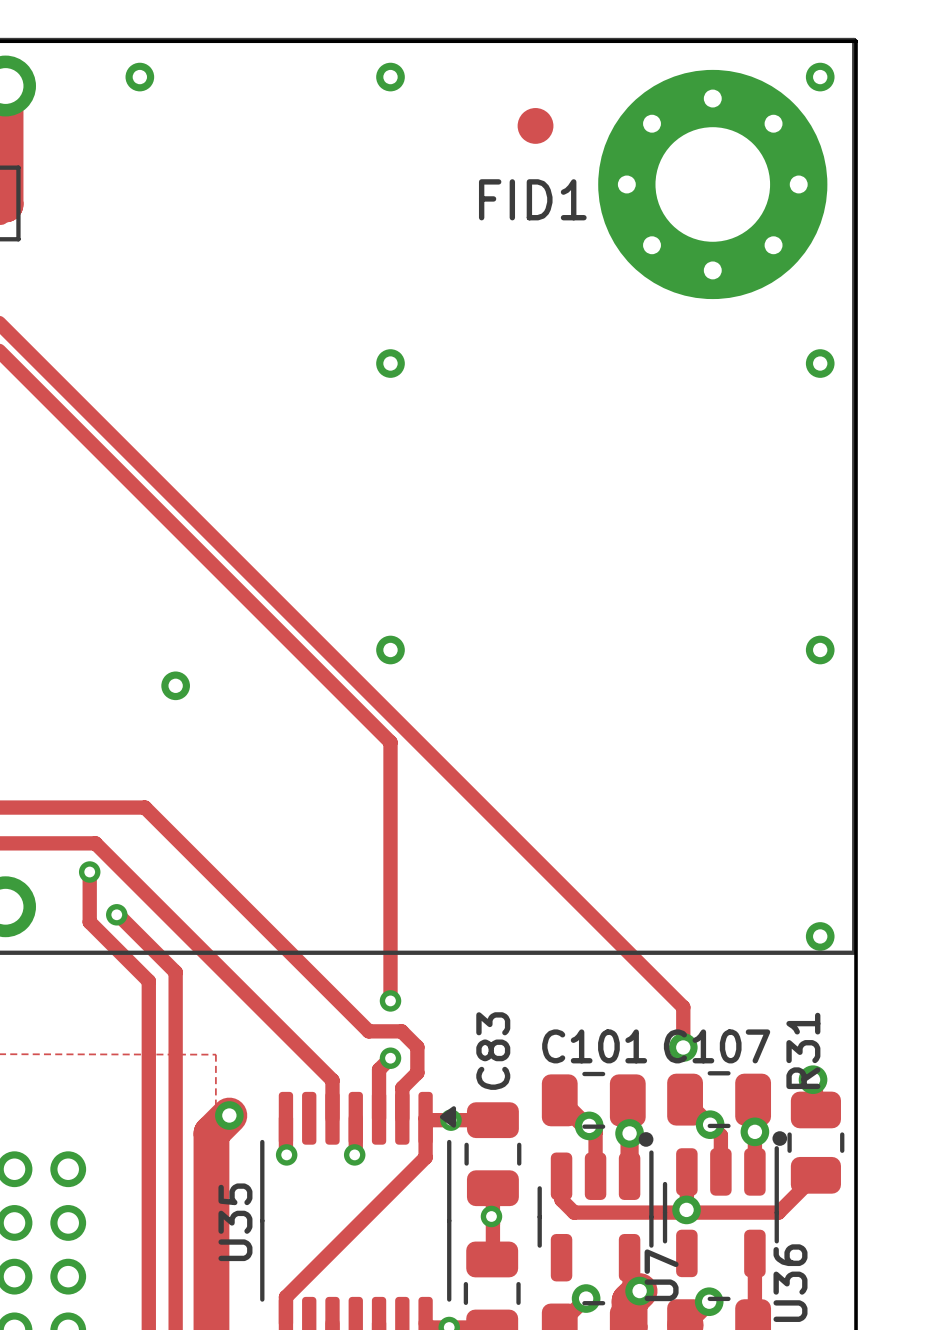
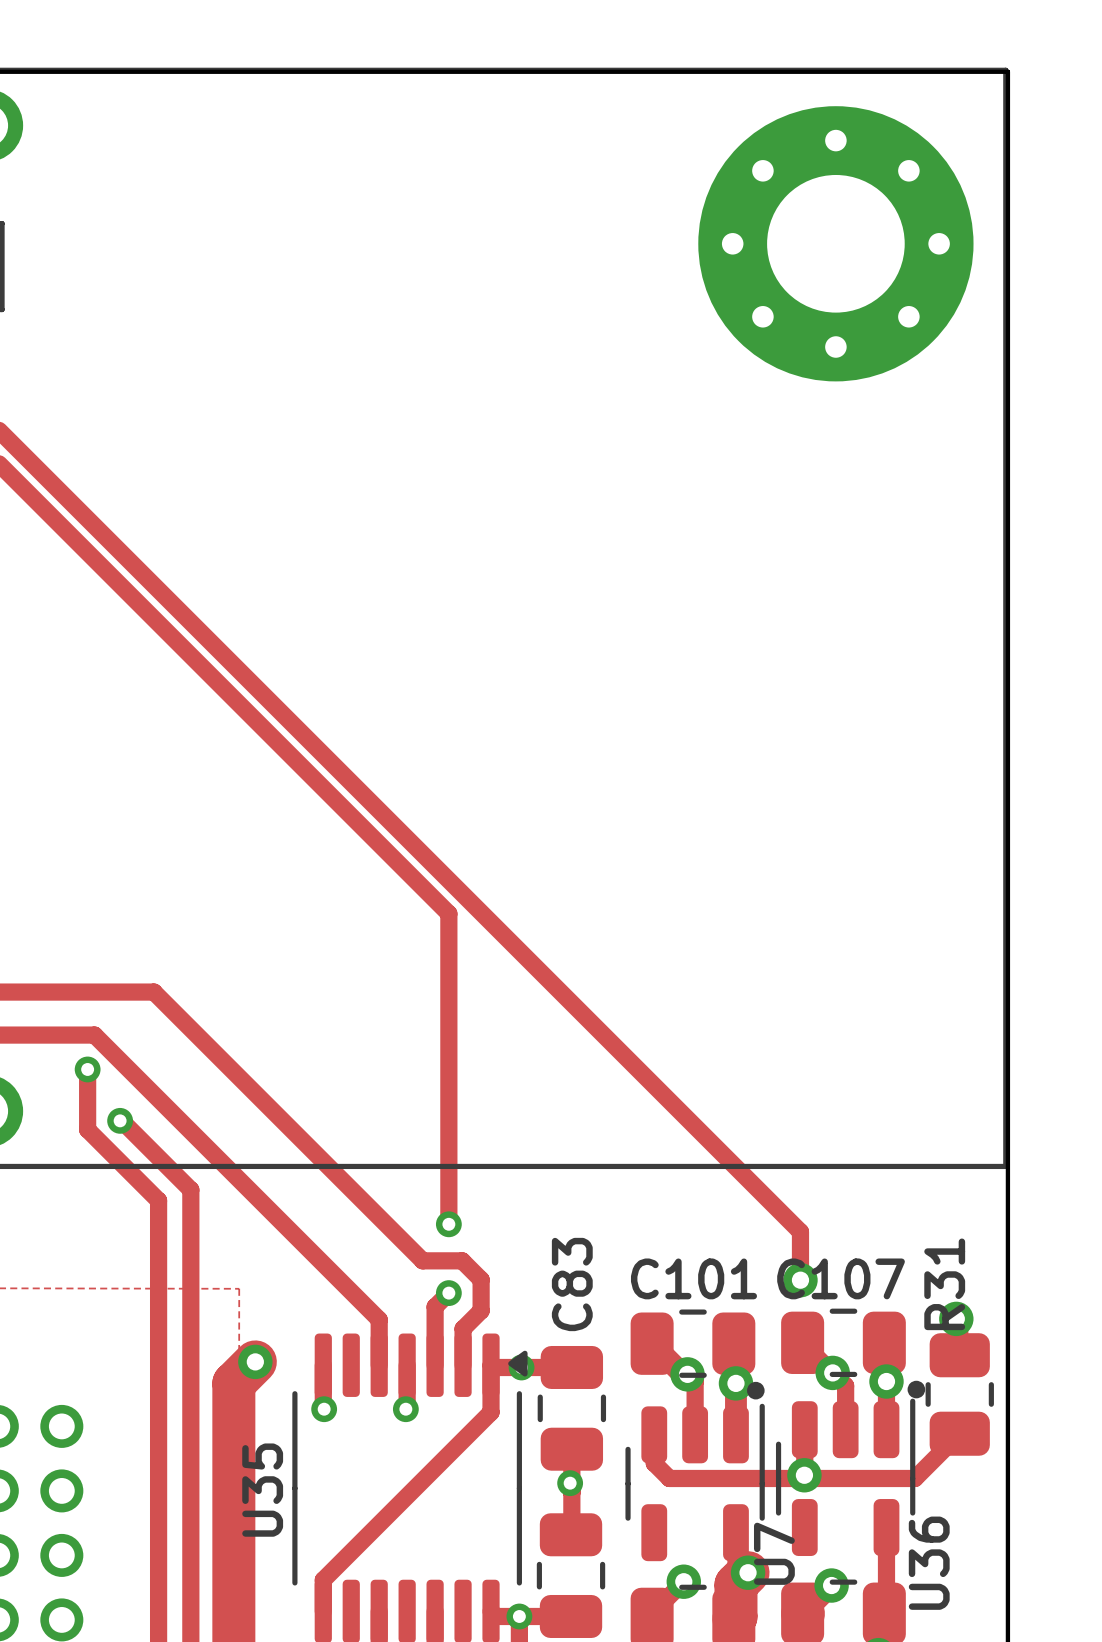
via: (139, 77) -> none
via: (390, 77) -> none
via: (820, 77) -> none
FID1: (535, 125) -> none
via: (390, 363) -> none
via: (820, 363) -> none
via: (390, 650) -> none
via: (820, 650) -> none
via: (175, 685) -> none
via: (820, 936) -> none

